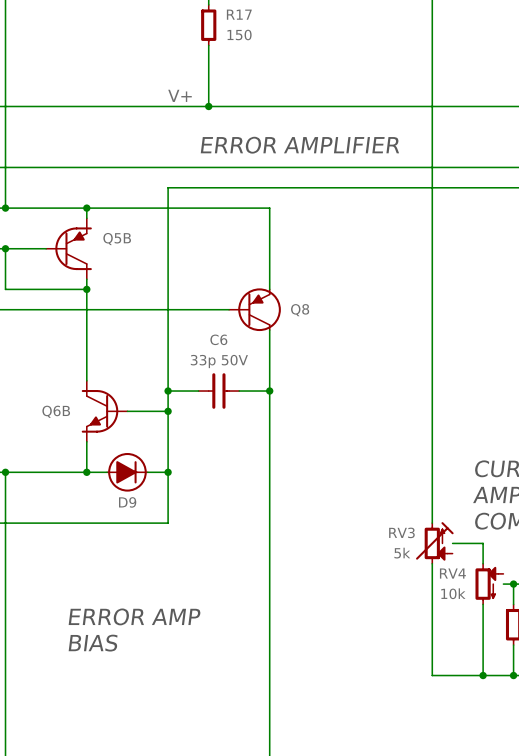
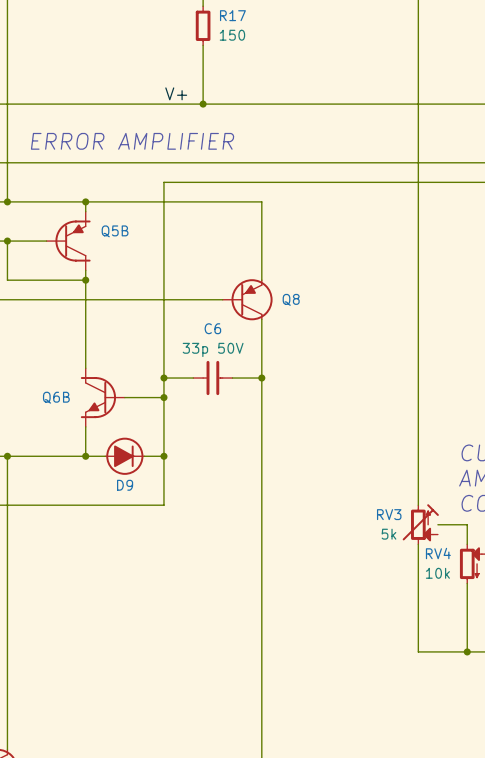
text position: ERROR AMPLIFIER (299, 145) -> ERROR AMPLIFIER (132, 141)
text: ERROR AMP (134, 616) -> none
text: BIAS (93, 643) -> none

